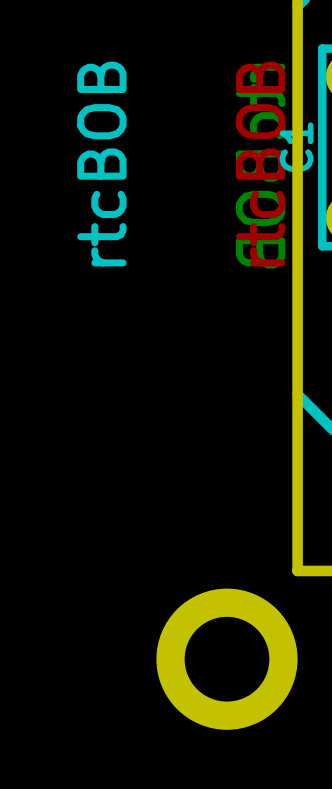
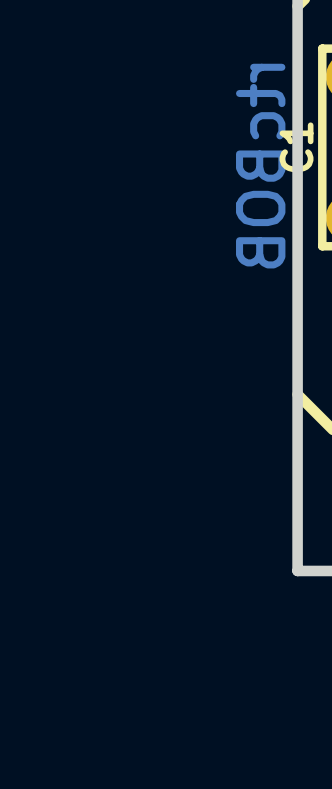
text: rtcBOB (101, 164) -> none
text: rtcBOB (260, 164) -> none
part: (227, 659) -> none

